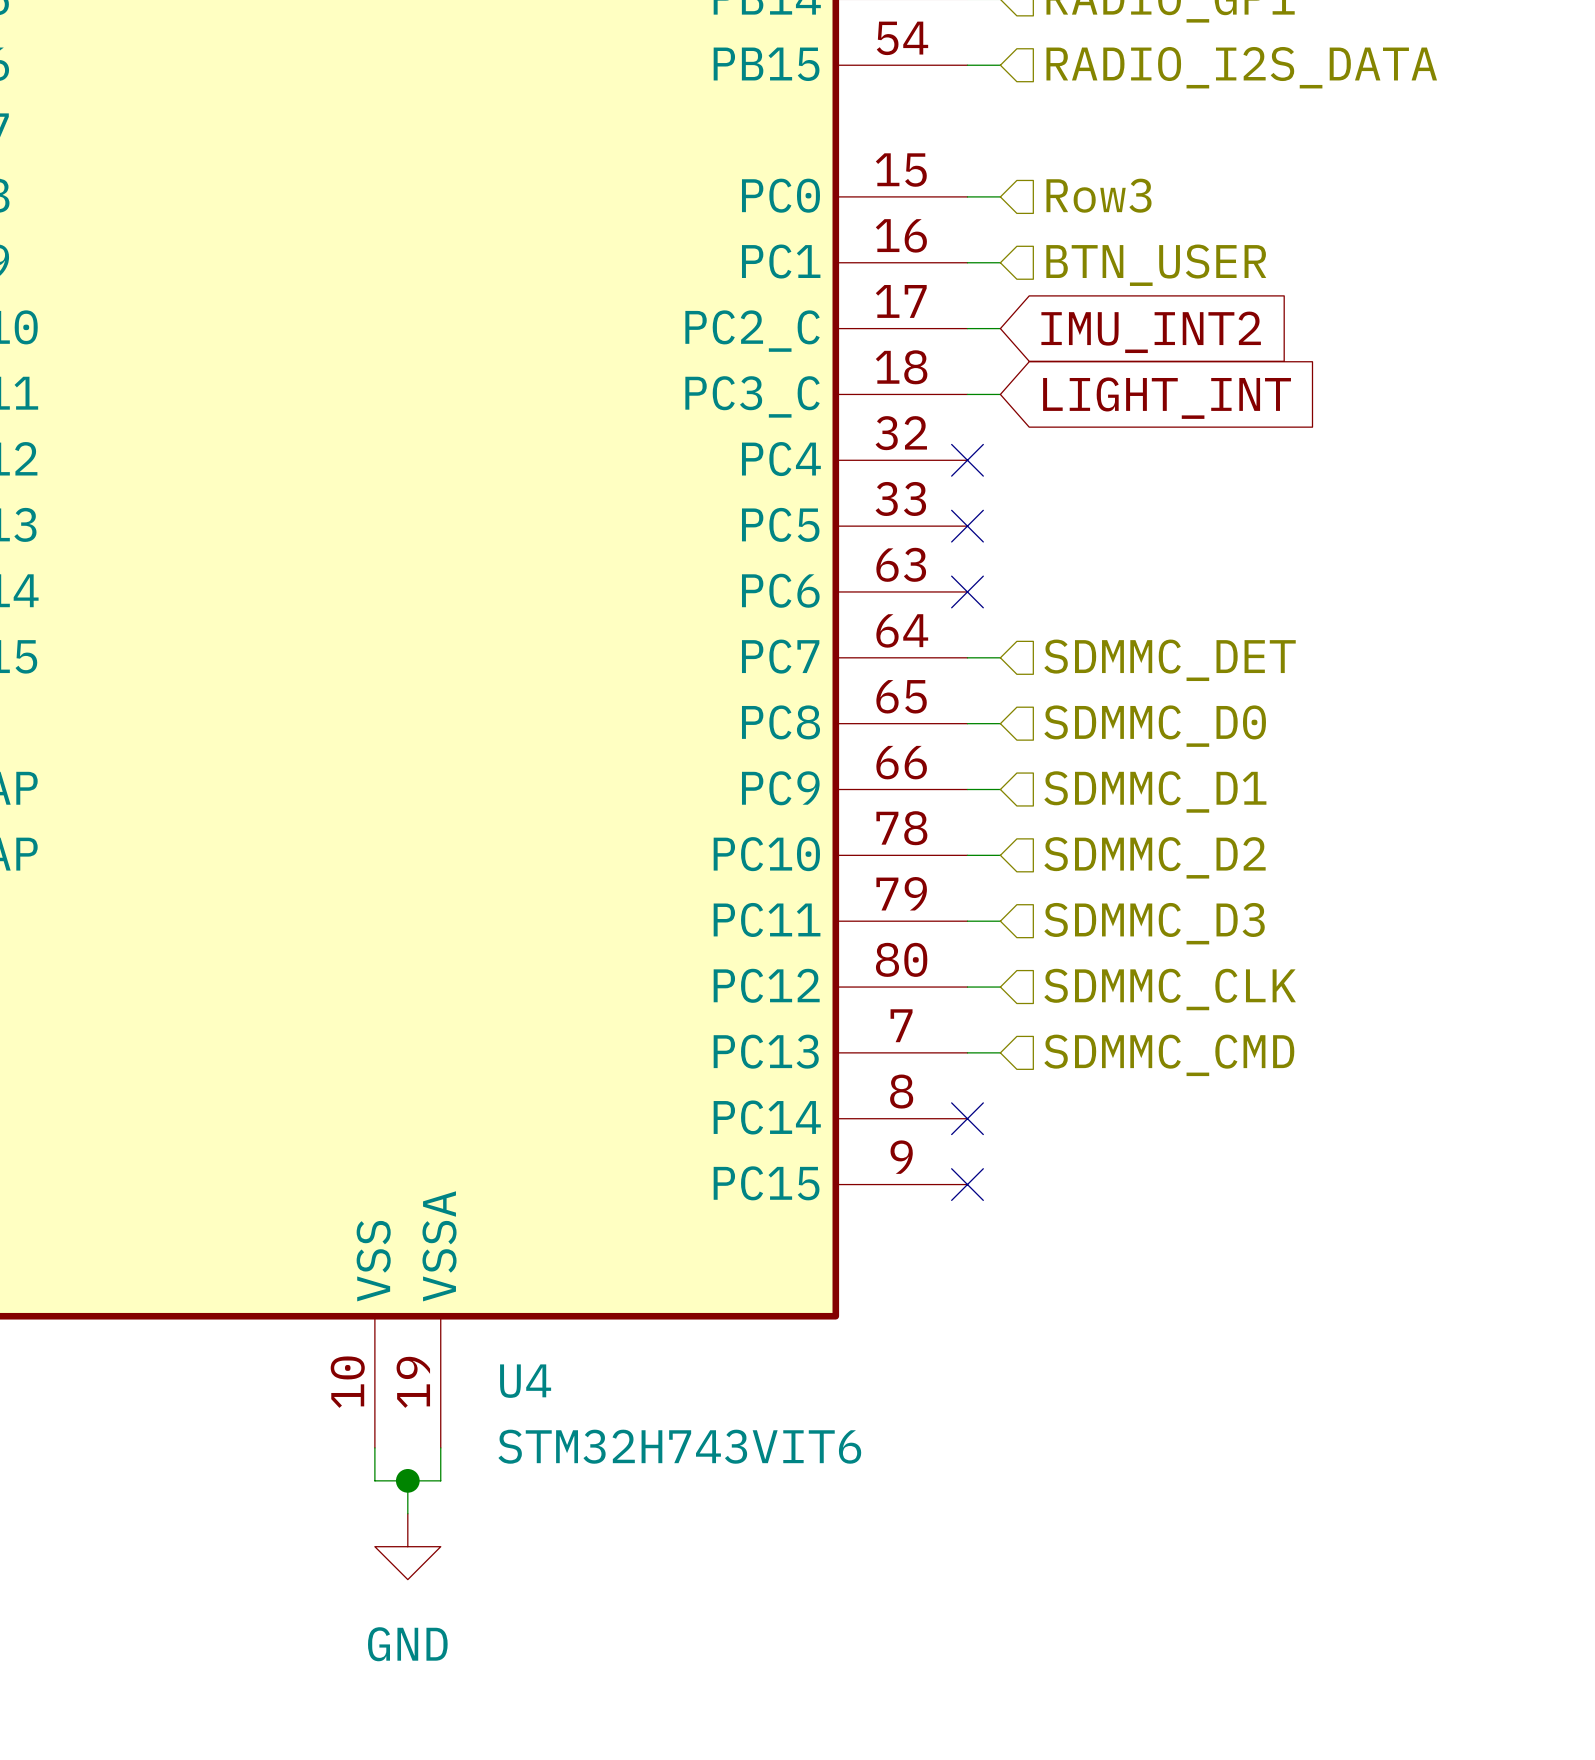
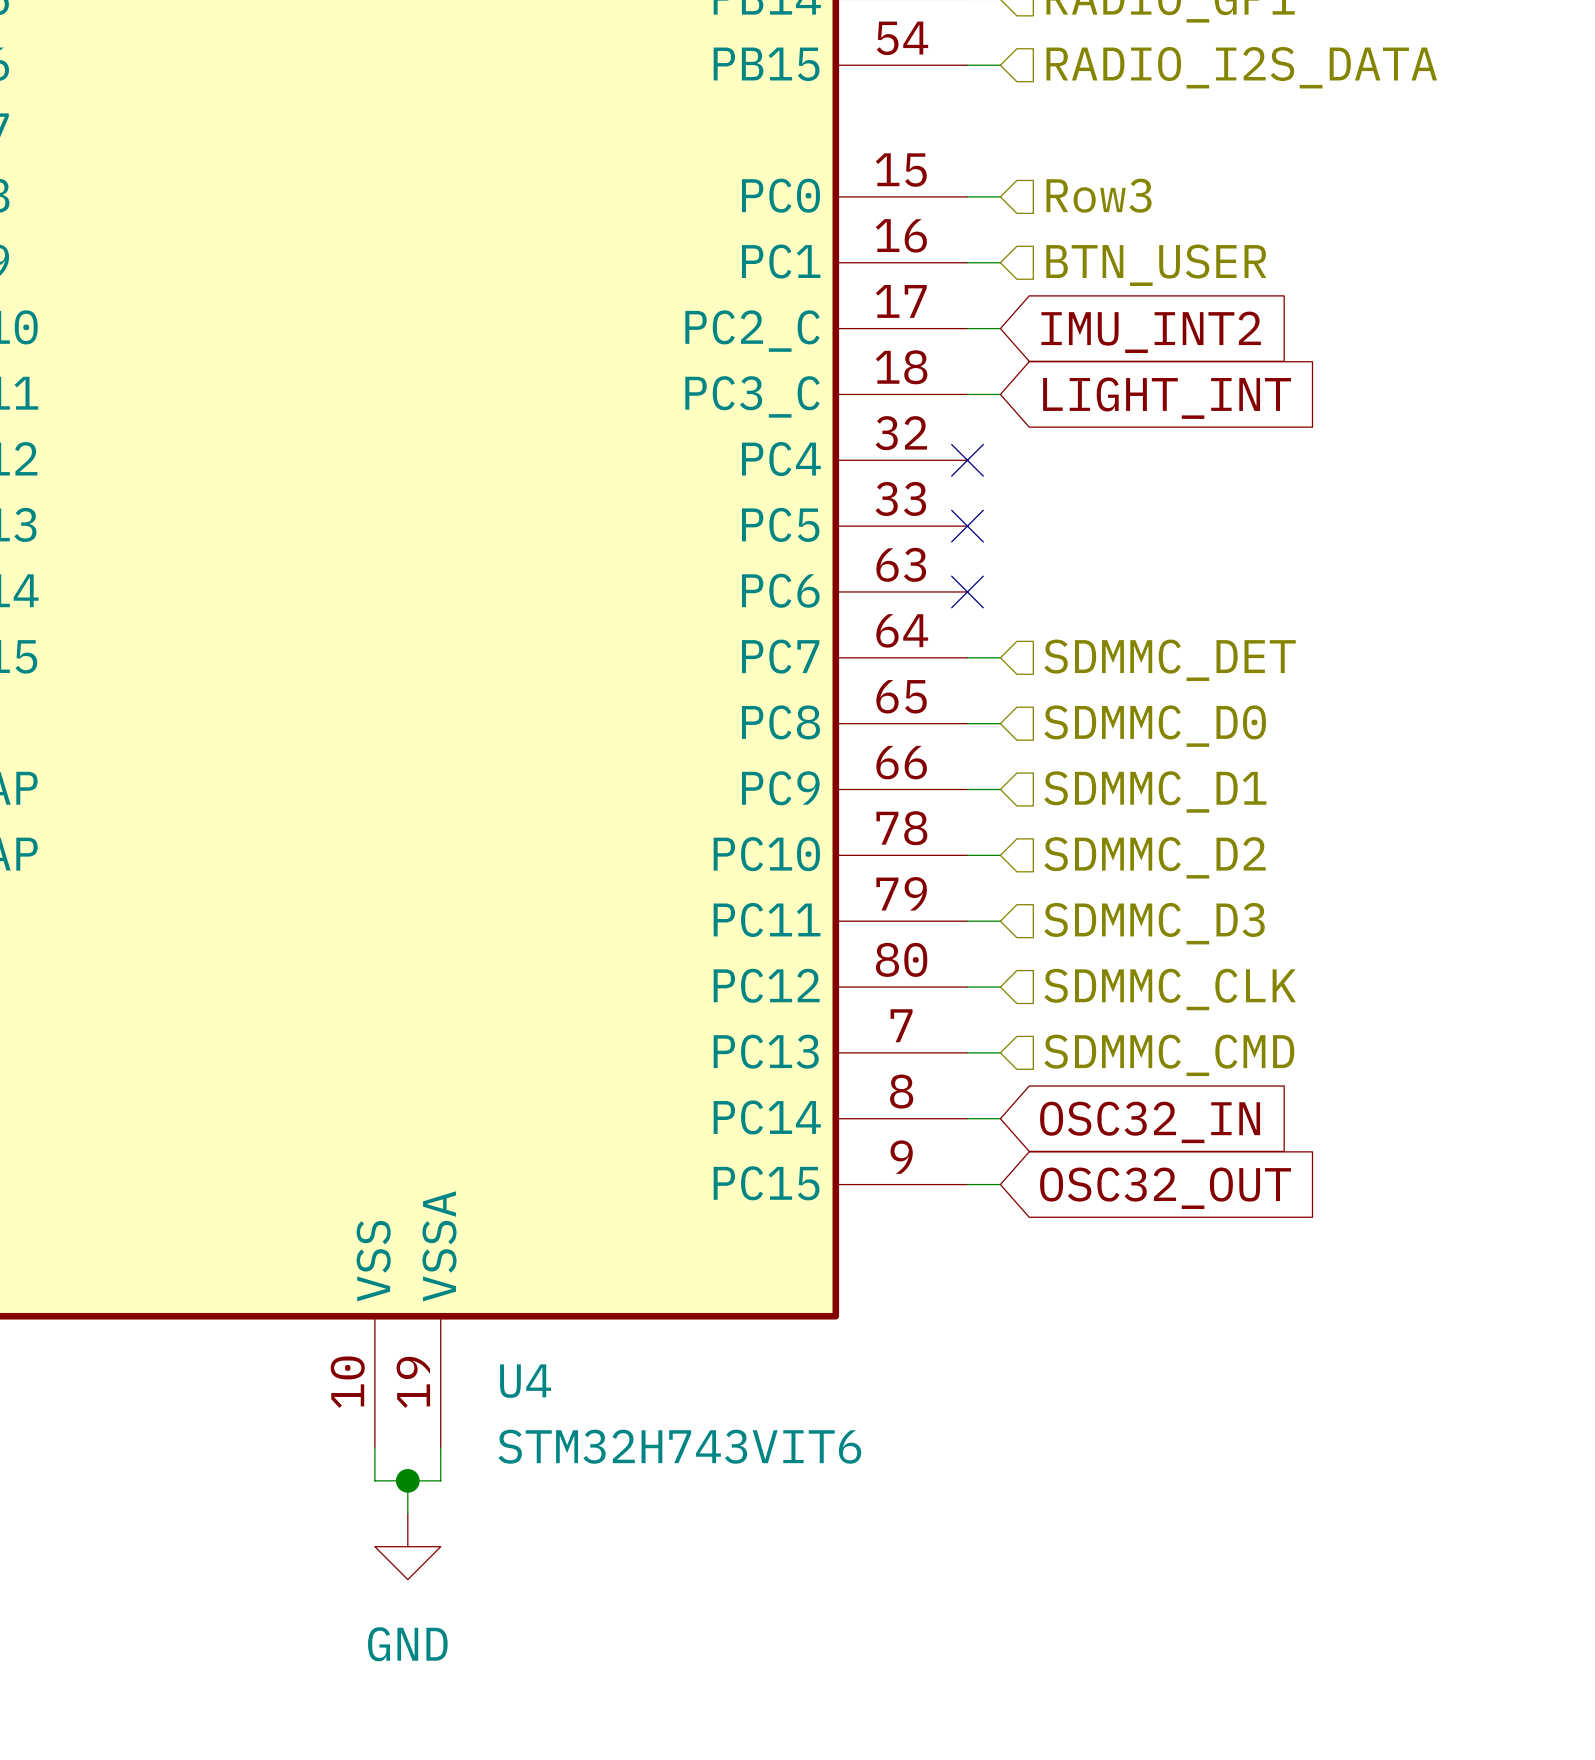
wire: none -> (967, 1118) (1000, 1118)
no-connect mark: (967, 1118) -> none
global label: none -> OSC32_IN (1150, 1122)
wire: none -> (967, 1184) (1000, 1184)
no-connect mark: (967, 1184) -> none
global label: none -> OSC32_OUT (1165, 1188)

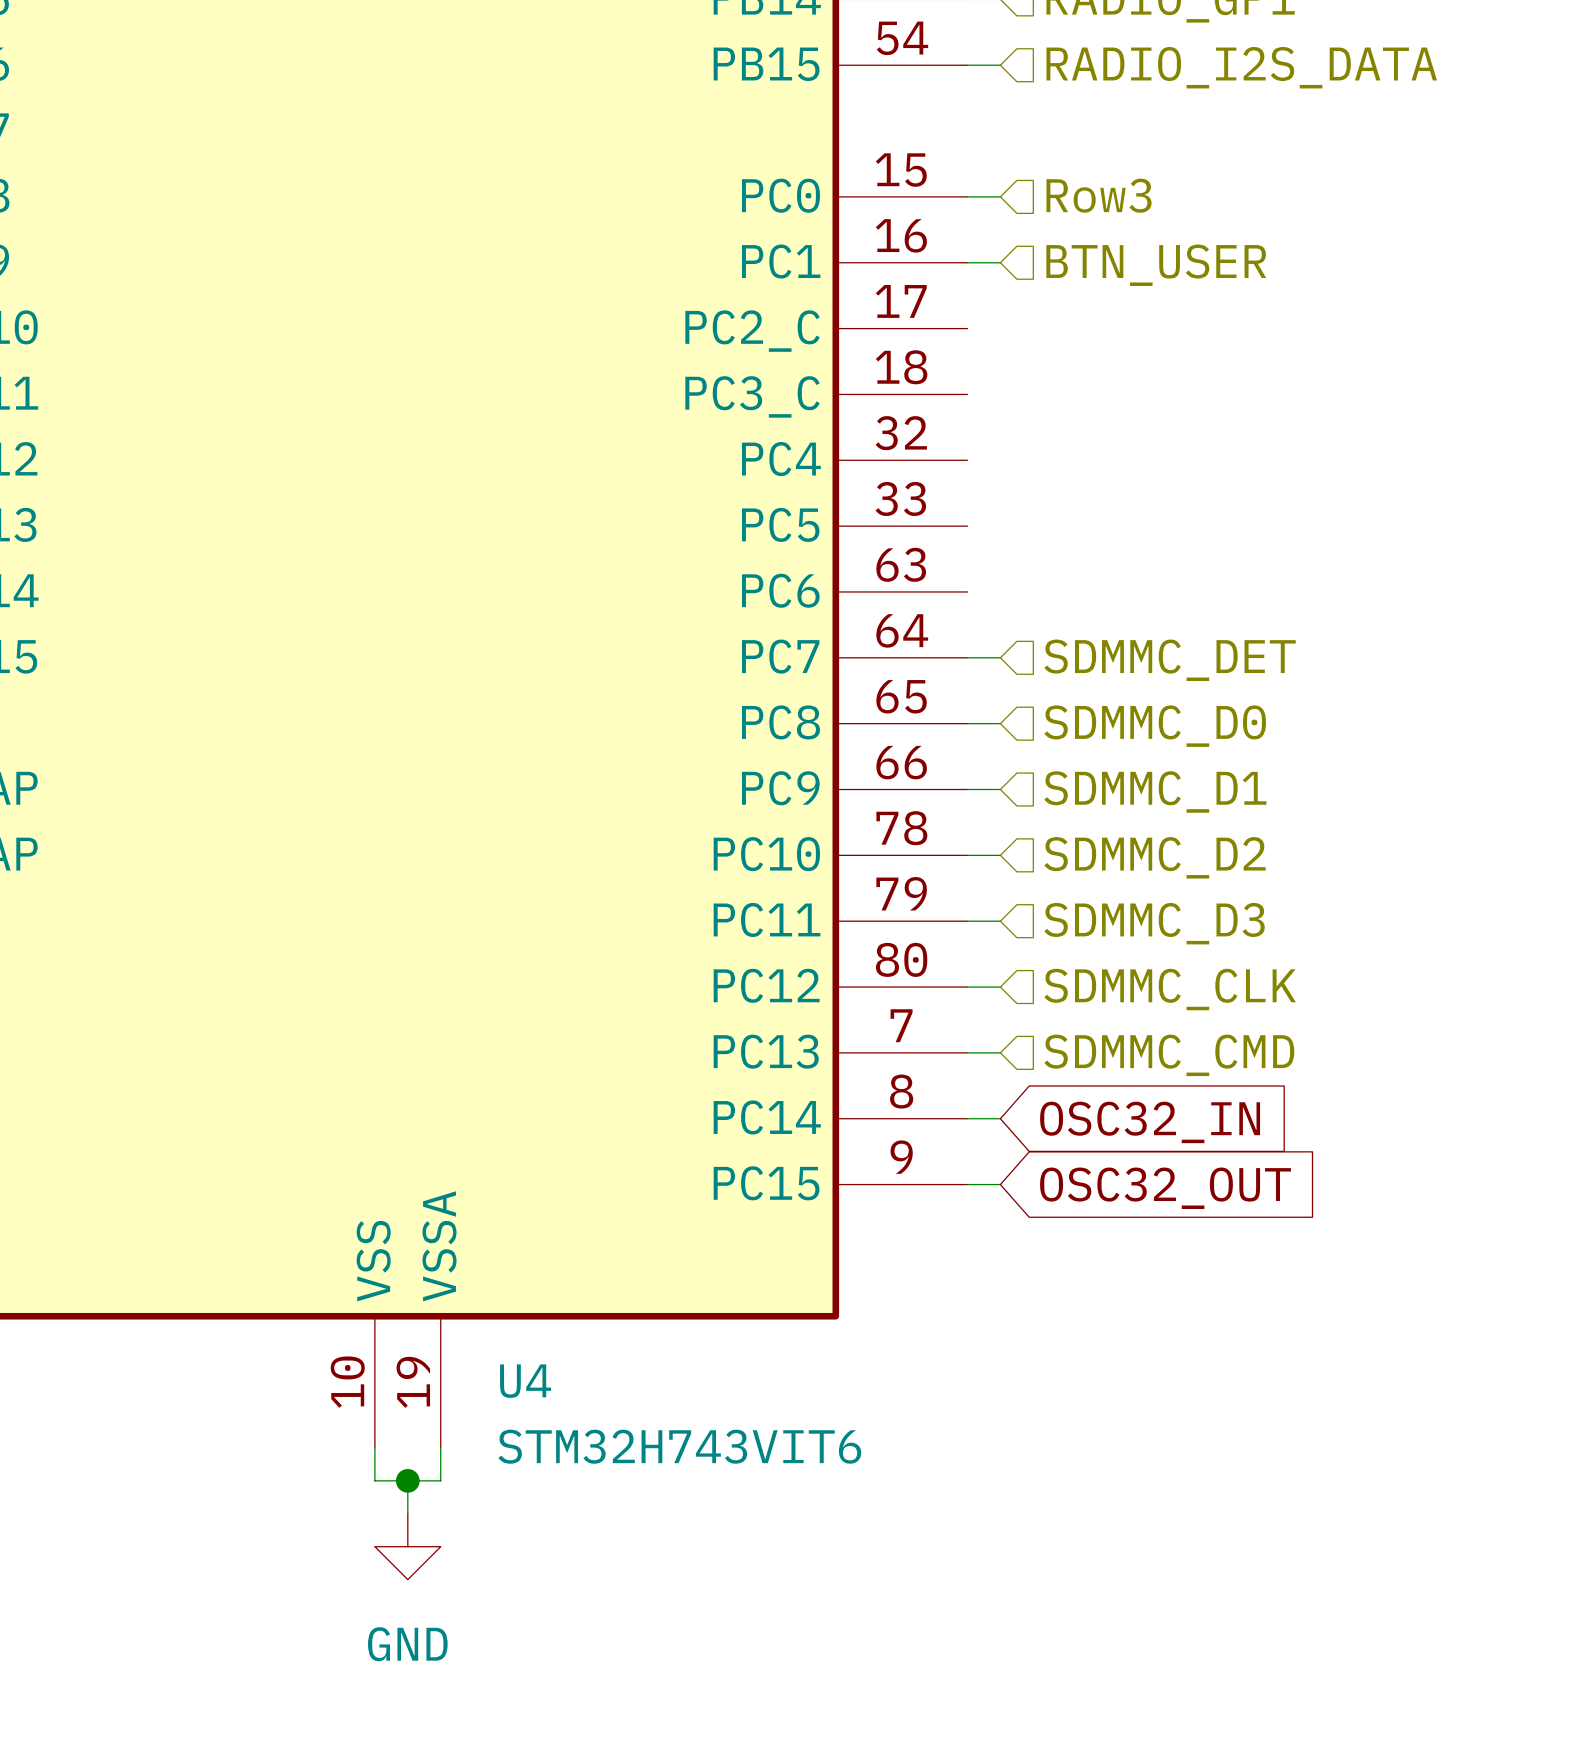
wire: (967, 328) (1000, 328) -> none
global label: IMU_INT2 (1151, 332) -> none
wire: (967, 394) (1000, 394) -> none
global label: LIGHT_INT (1167, 398) -> none
no-connect mark: (967, 460) -> none
no-connect mark: (967, 526) -> none
no-connect mark: (967, 591) -> none

